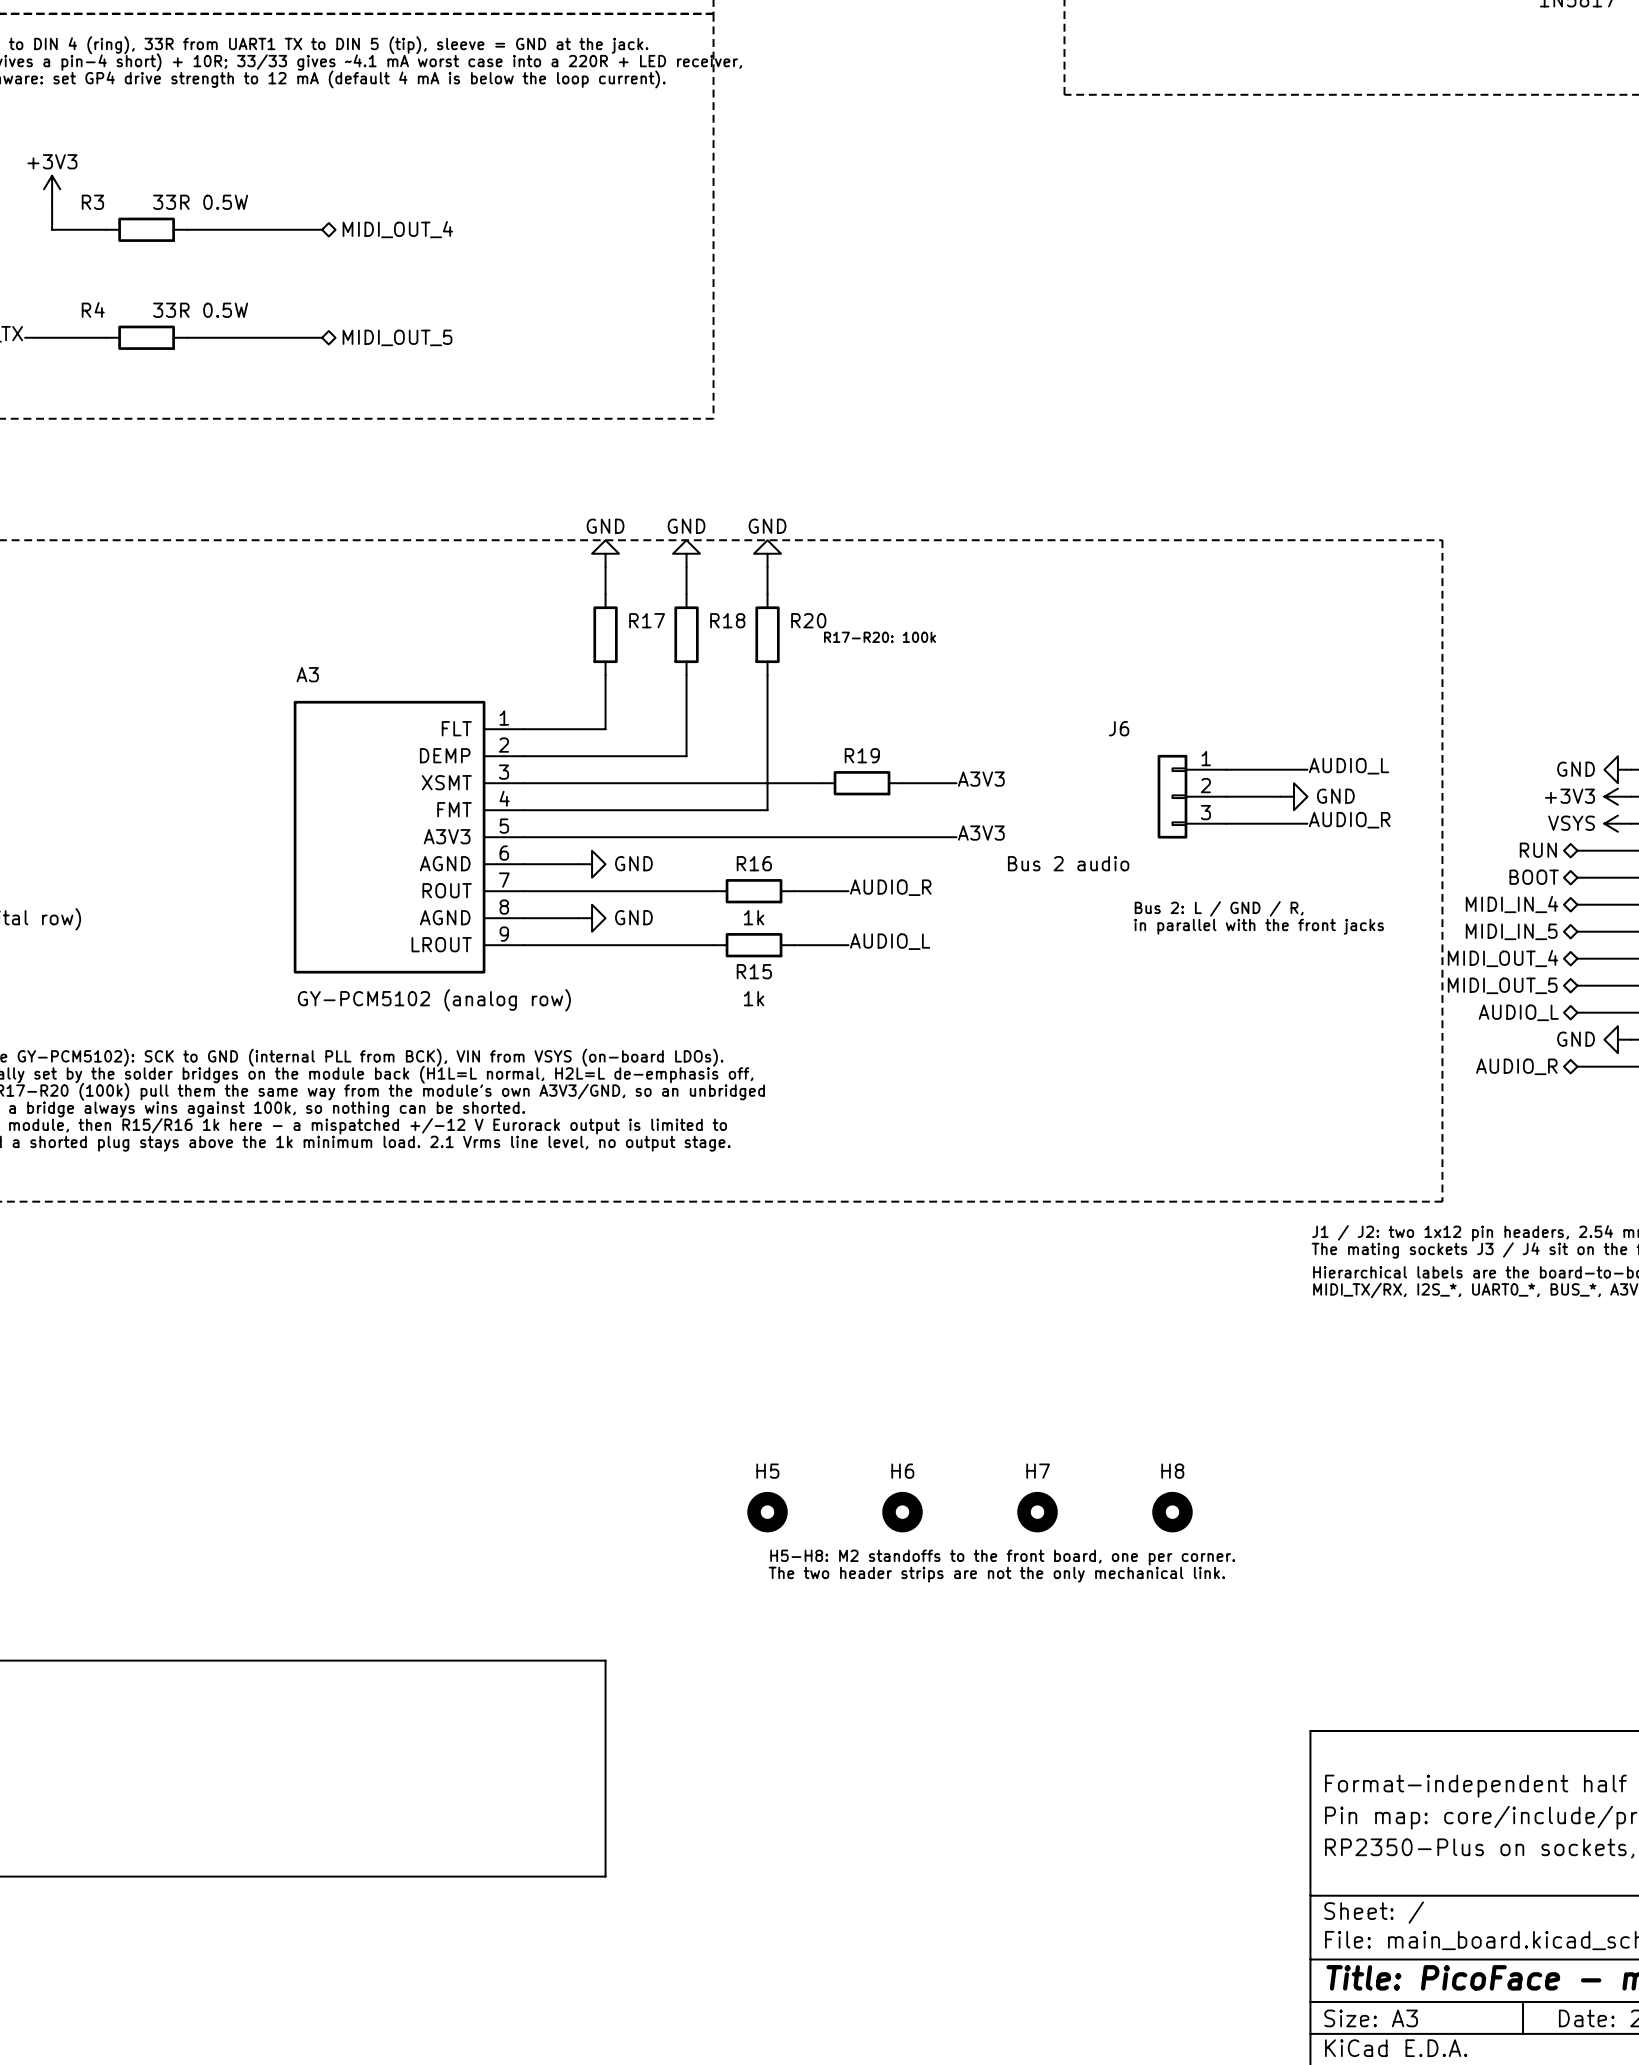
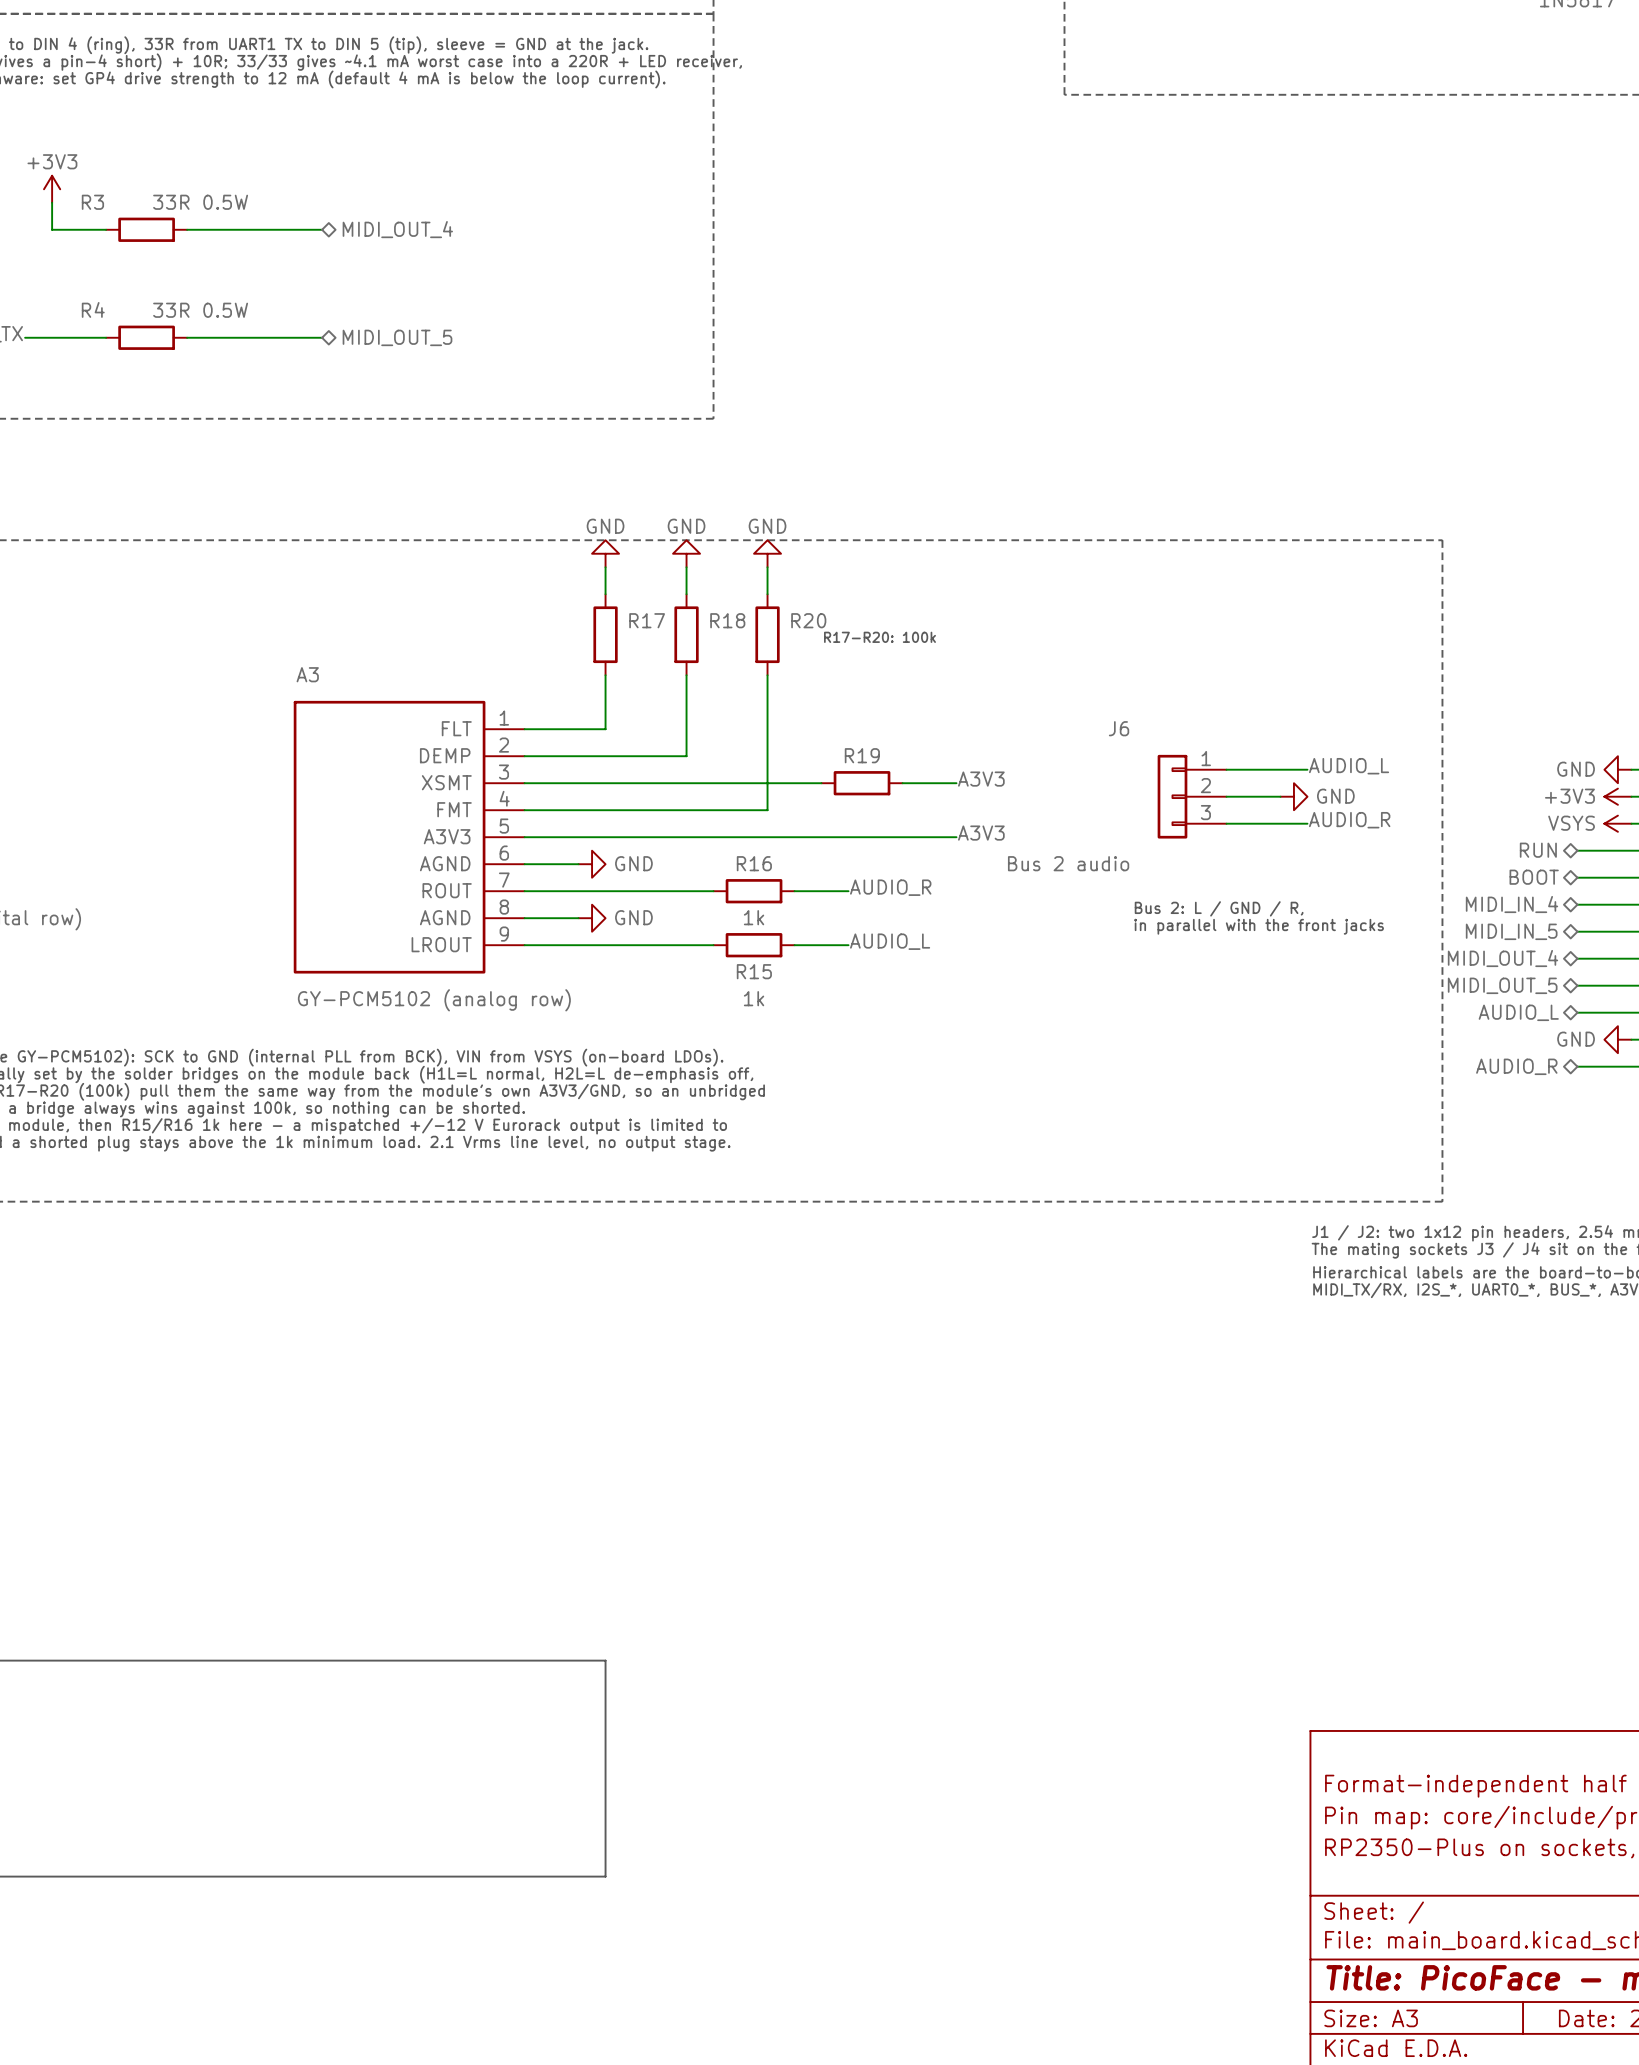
H5: (767, 1512) -> none
H6: (902, 1512) -> none
H7: (1037, 1512) -> none
H8: (1172, 1512) -> none
text: H5-H8: M2 standoffs to the front board, one per corner. (1002, 1557) -> none
text: The two header strips are not the only mechanical link. (996, 1574) -> none

